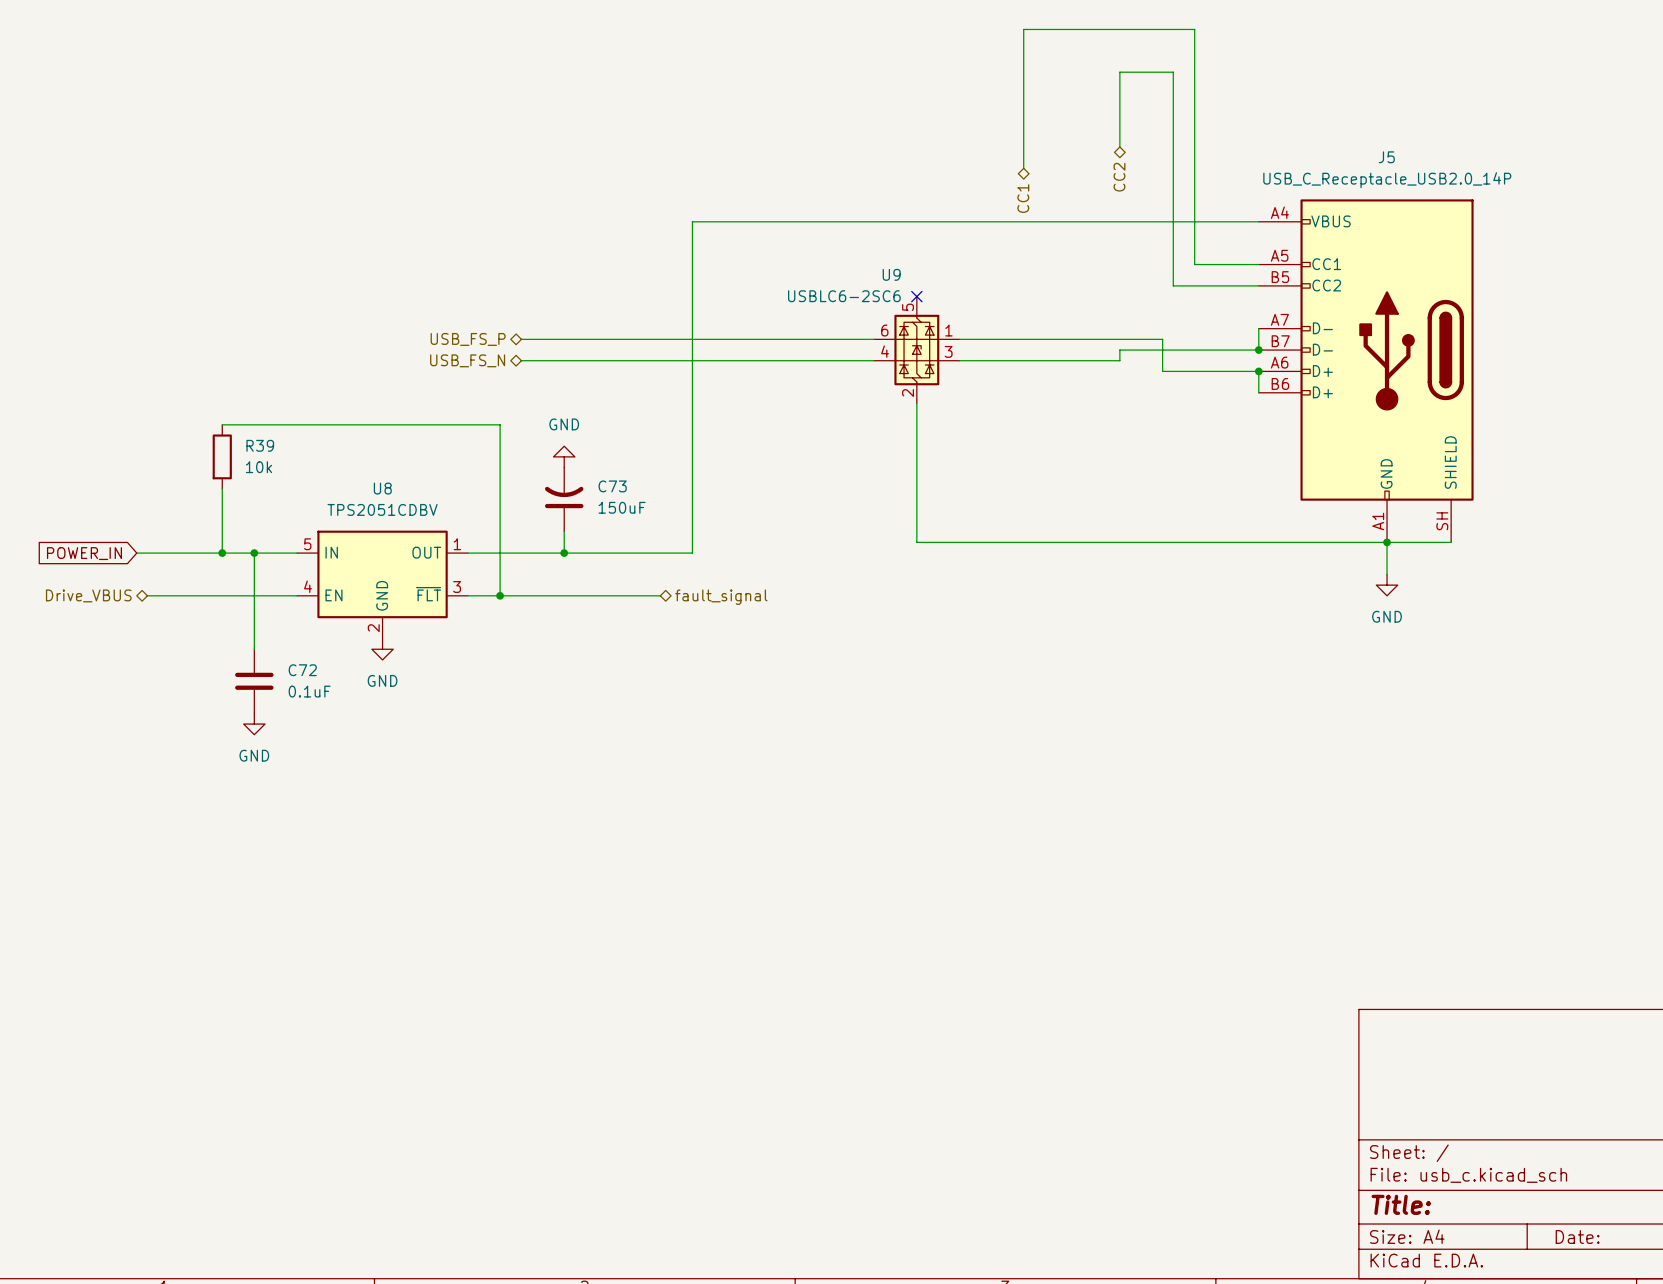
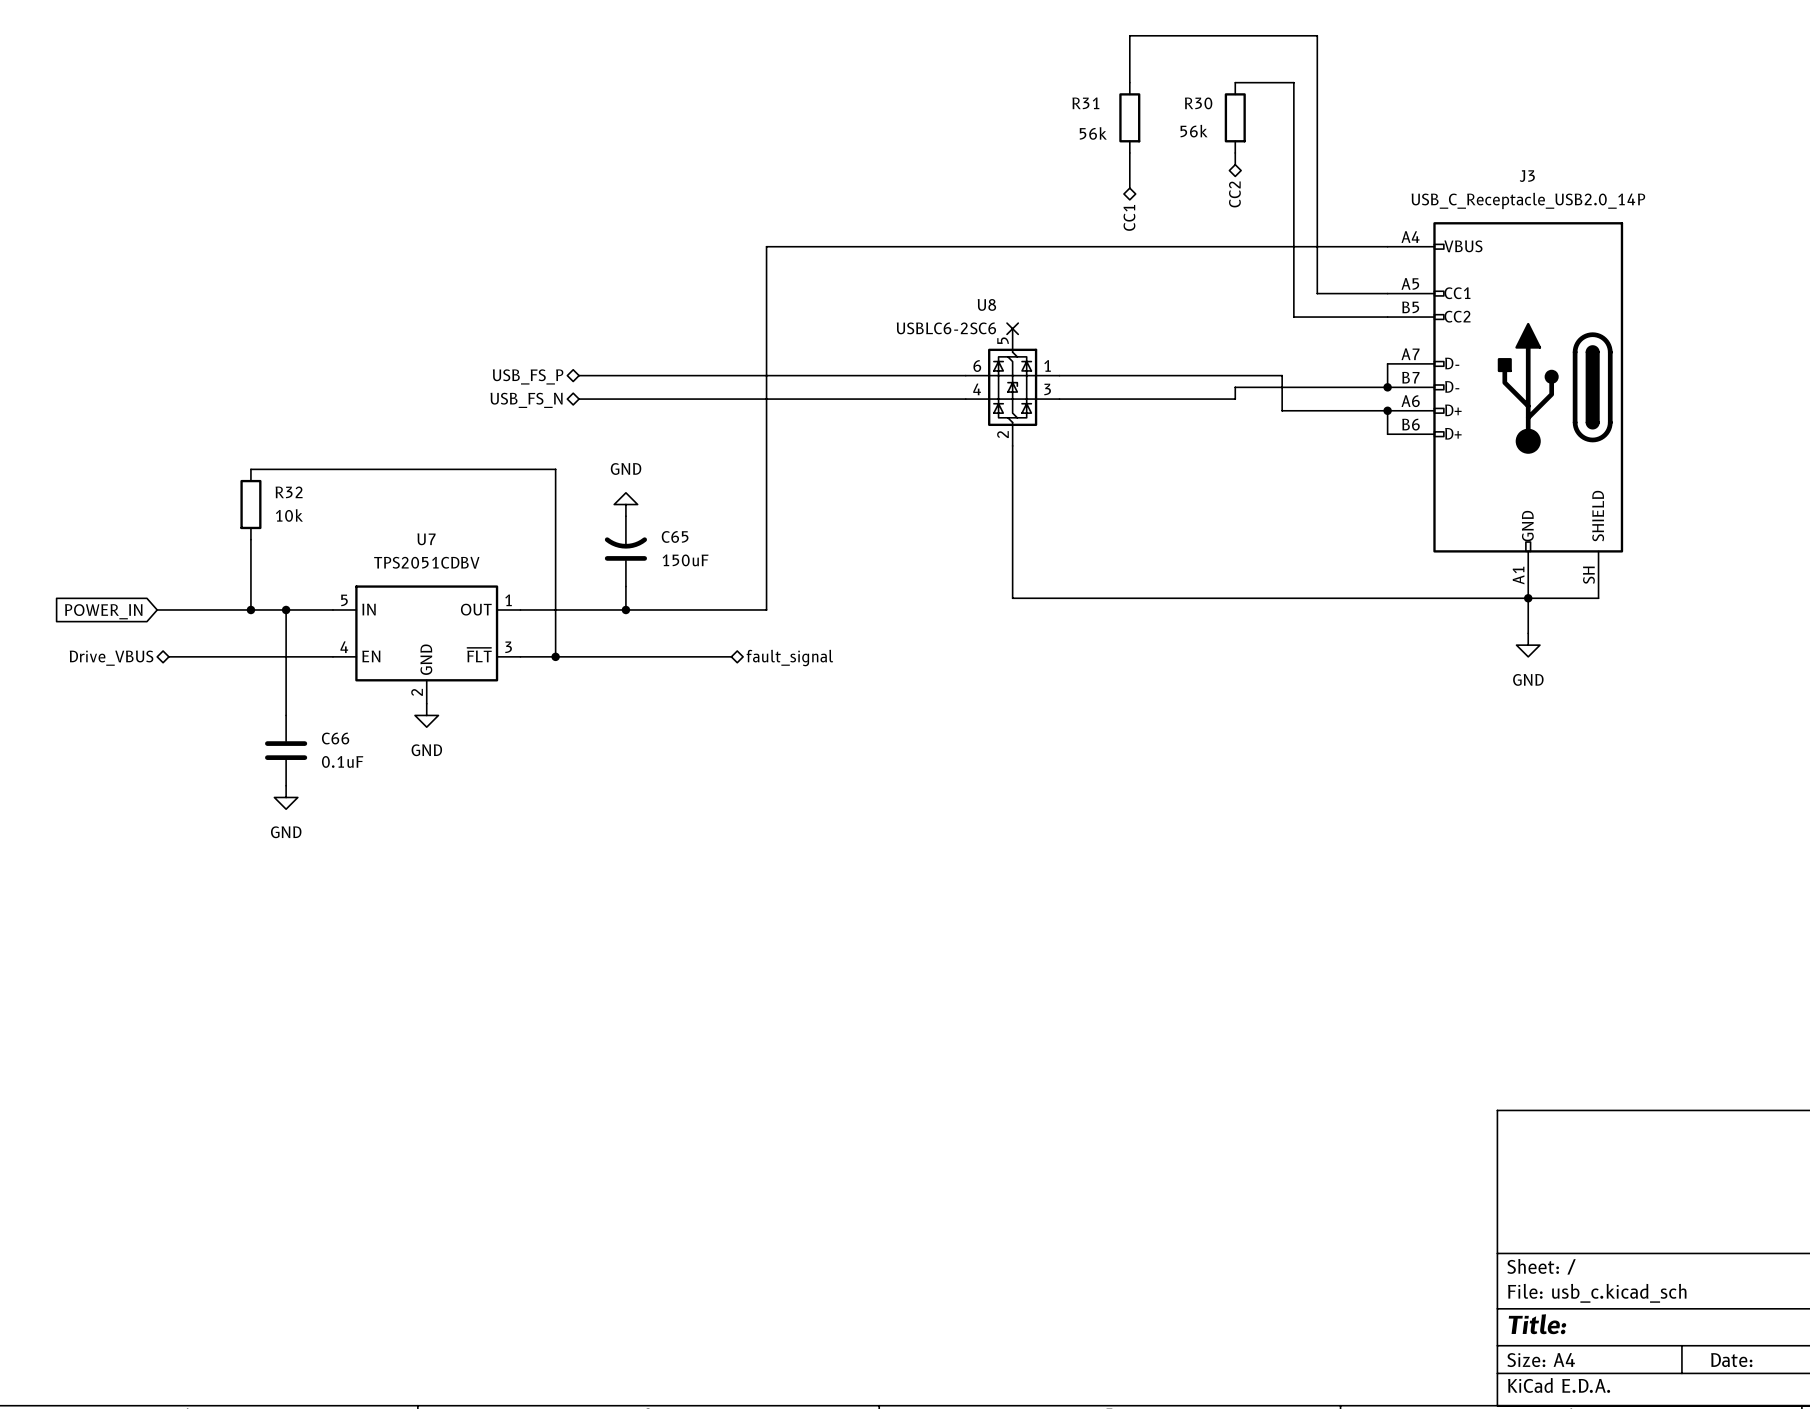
wire: (1023, 72) (1023, 136) -> none
wire: (1119, 72) (1119, 136) -> none
R31: none -> 56k (1129, 117)
R30: none -> 56k (1235, 117)
J5 name: J5 (1386, 157) -> J3 (1527, 176)
U9 name: U9 (891, 274) -> U8 (986, 304)
R39 name: R39 (260, 445) -> R32 (289, 492)
C73 name: C73 (612, 486) -> C65 (675, 536)
U8 name: U8 (382, 488) -> U7 (426, 539)
C72 name: C72 (302, 670) -> C66 (335, 738)

